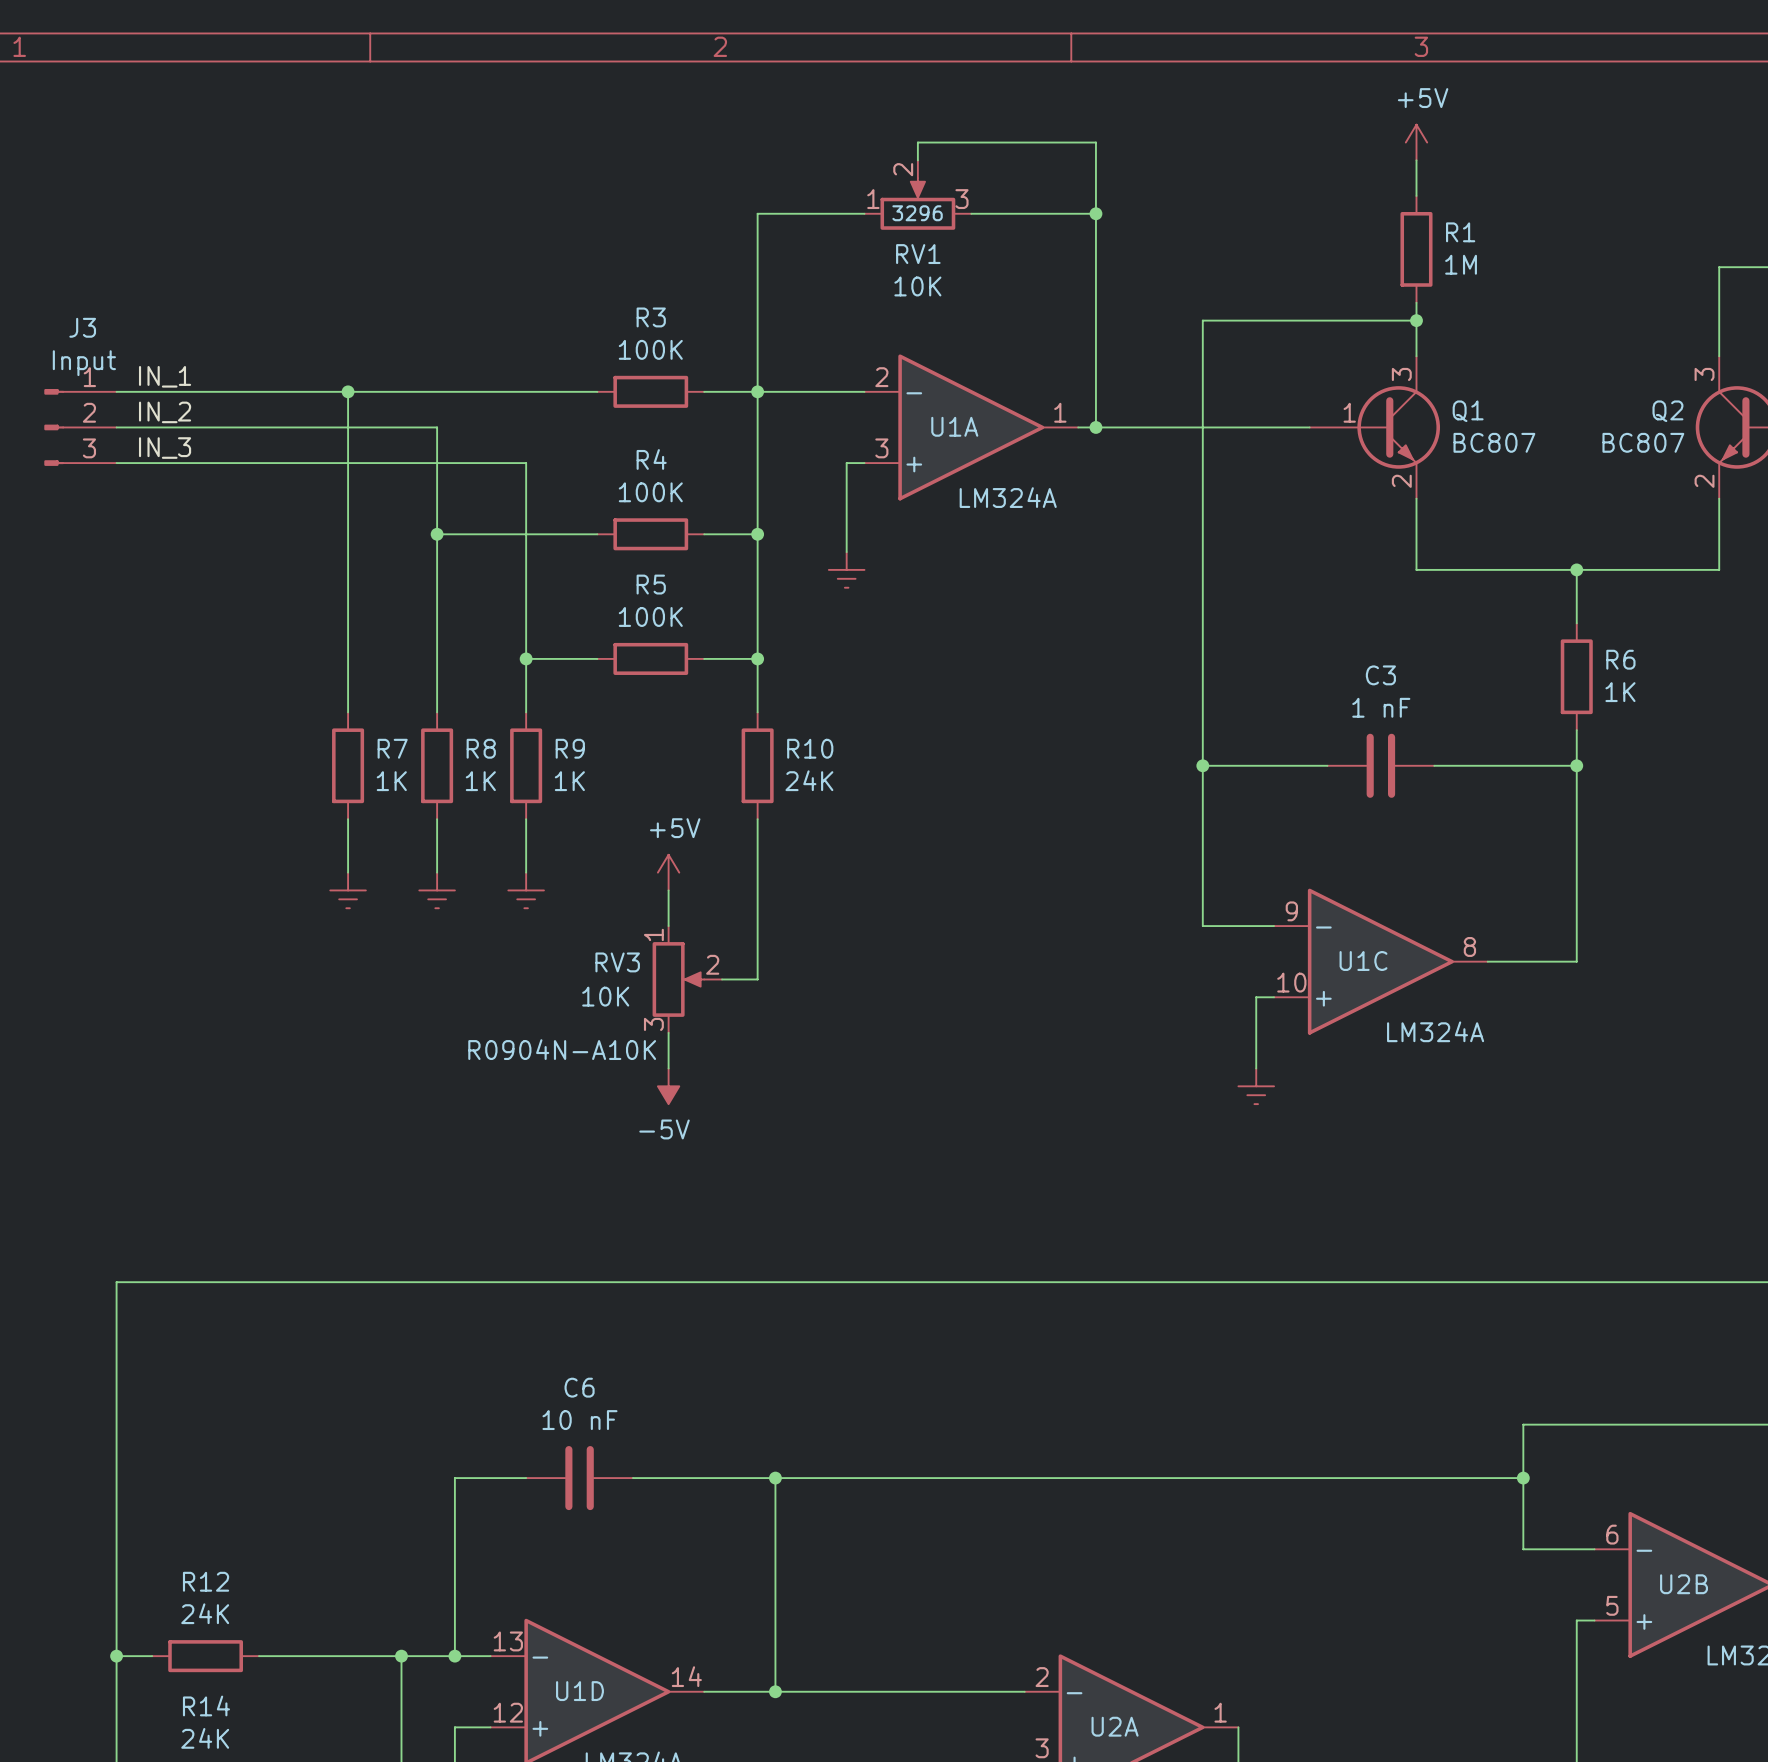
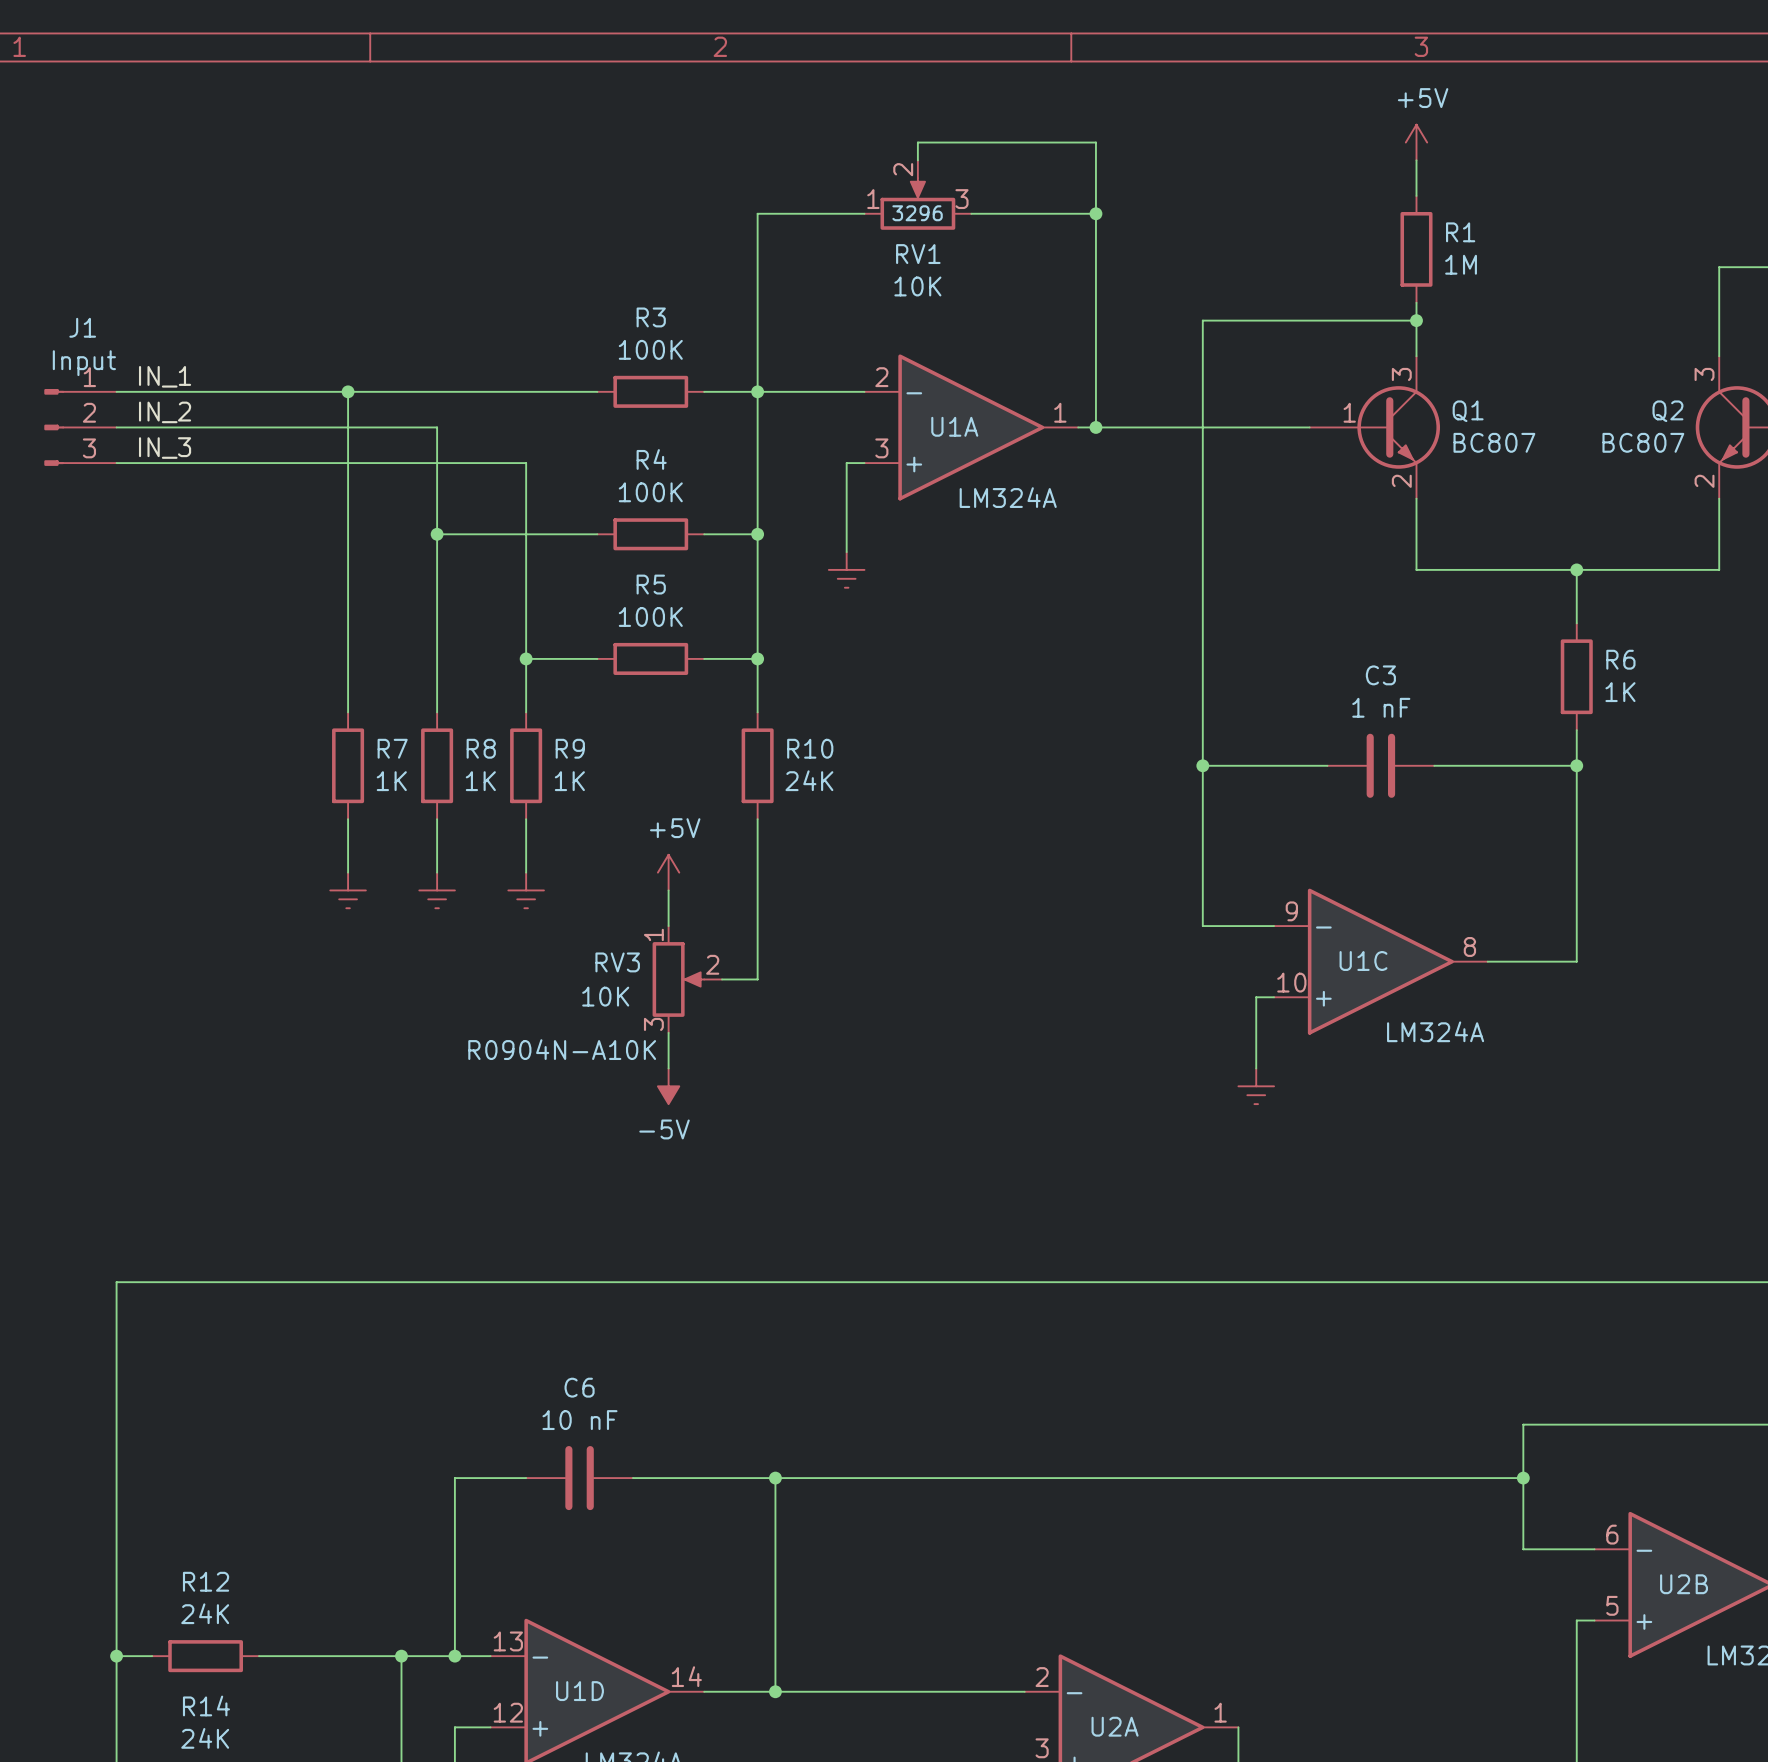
J3 name: J3 (82, 327) -> J1 (82, 327)

